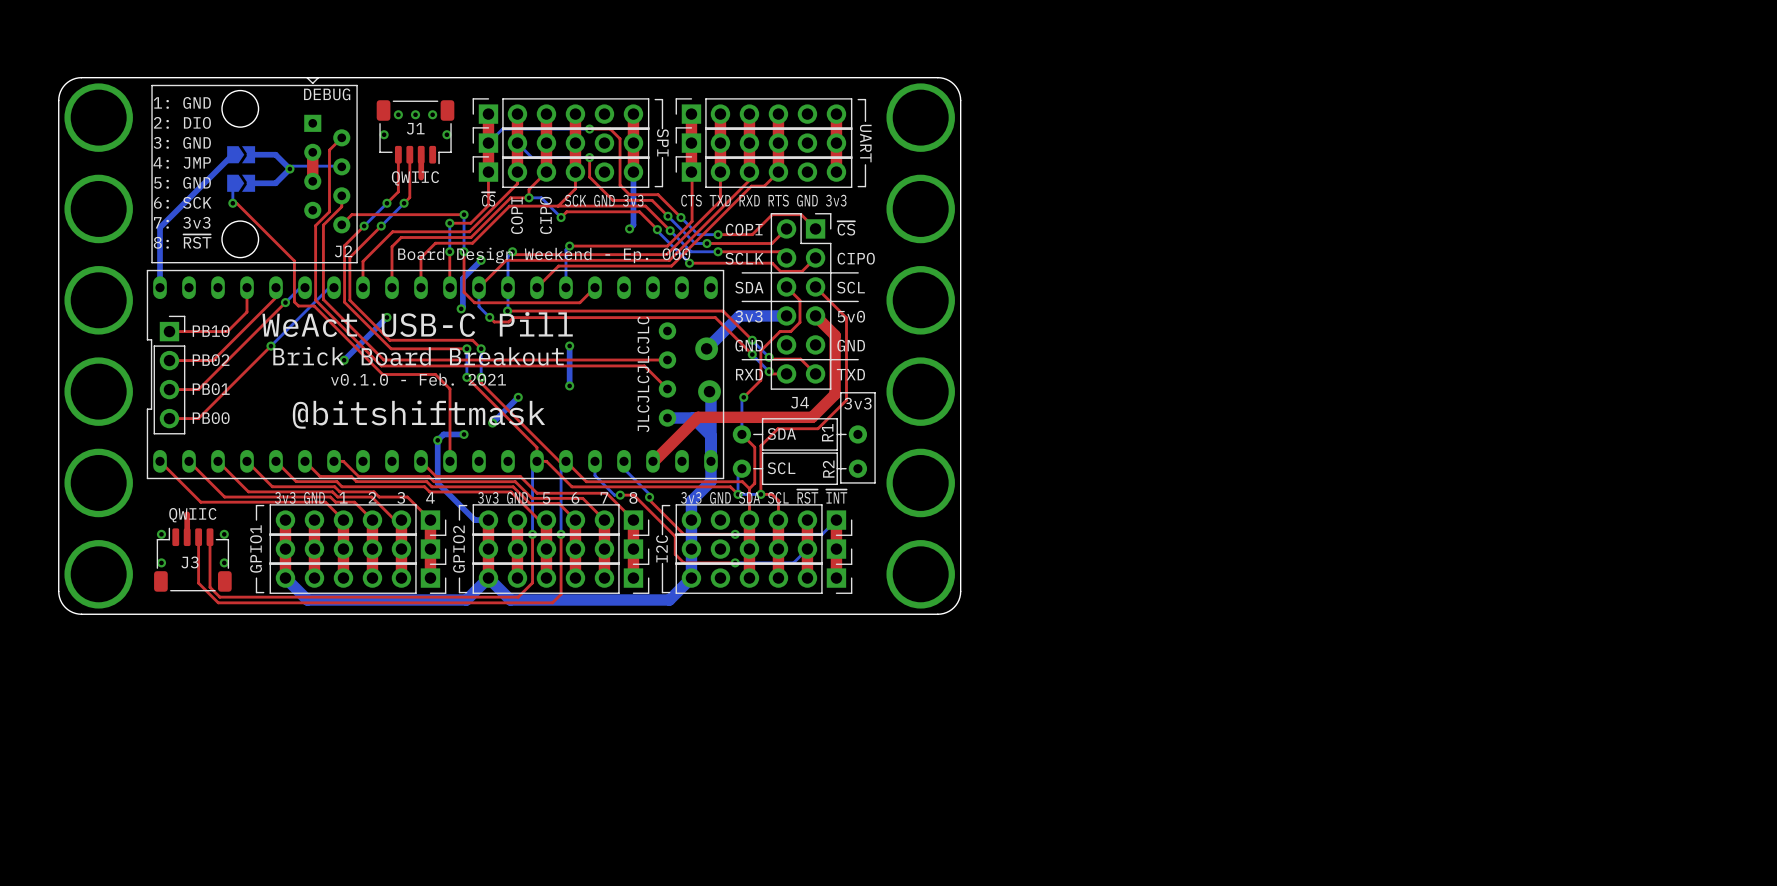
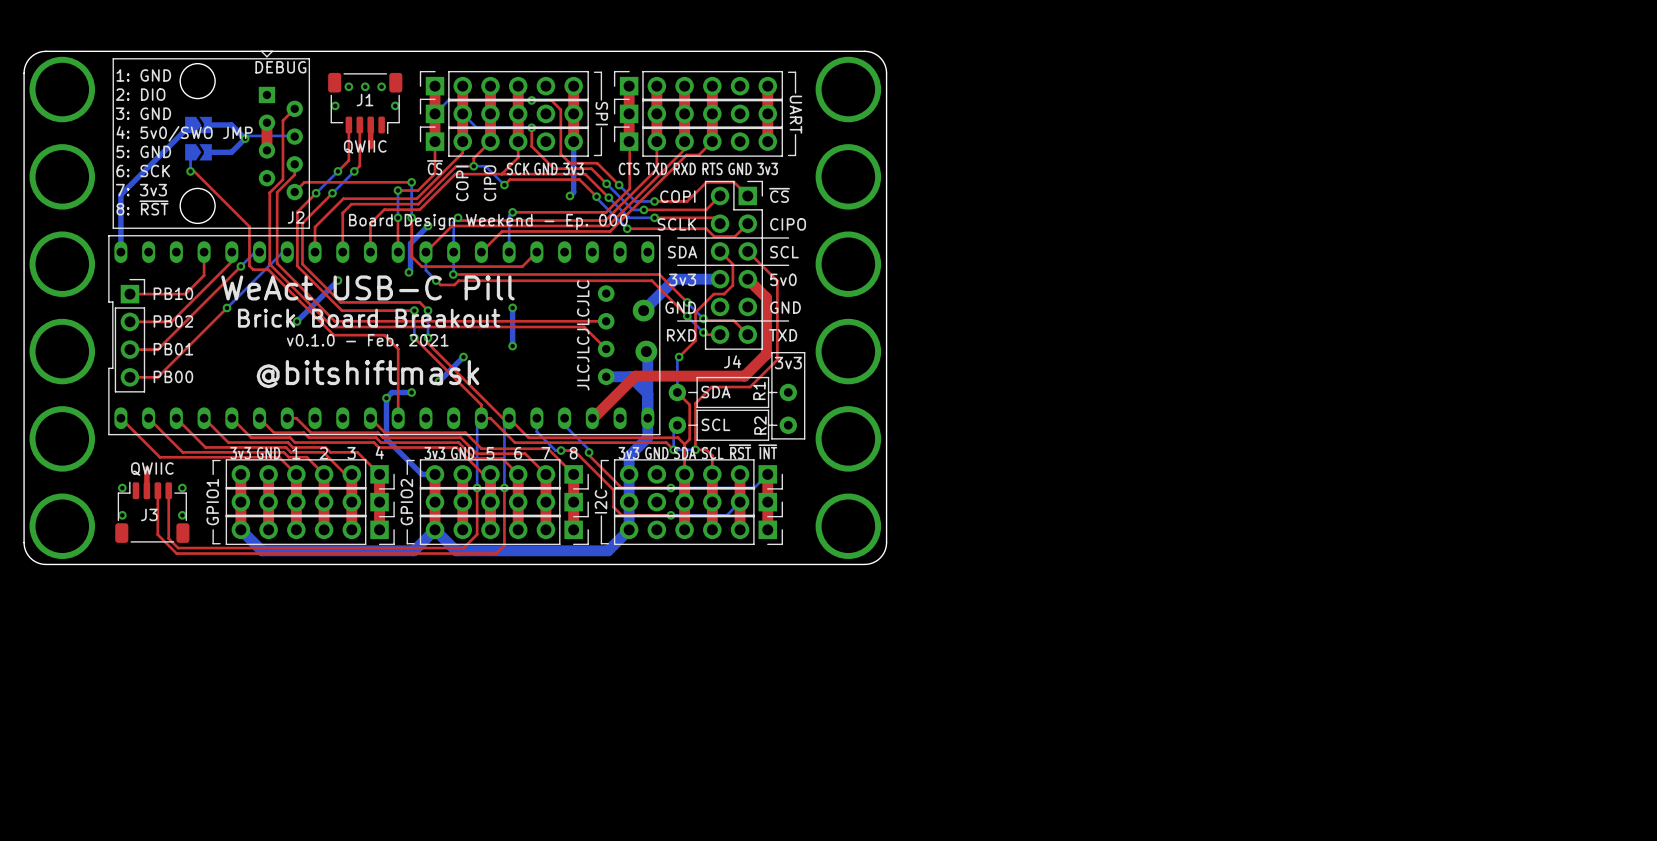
text: 4: JMP (182, 162) -> 4: 5v0/SWO JMP (184, 133)

